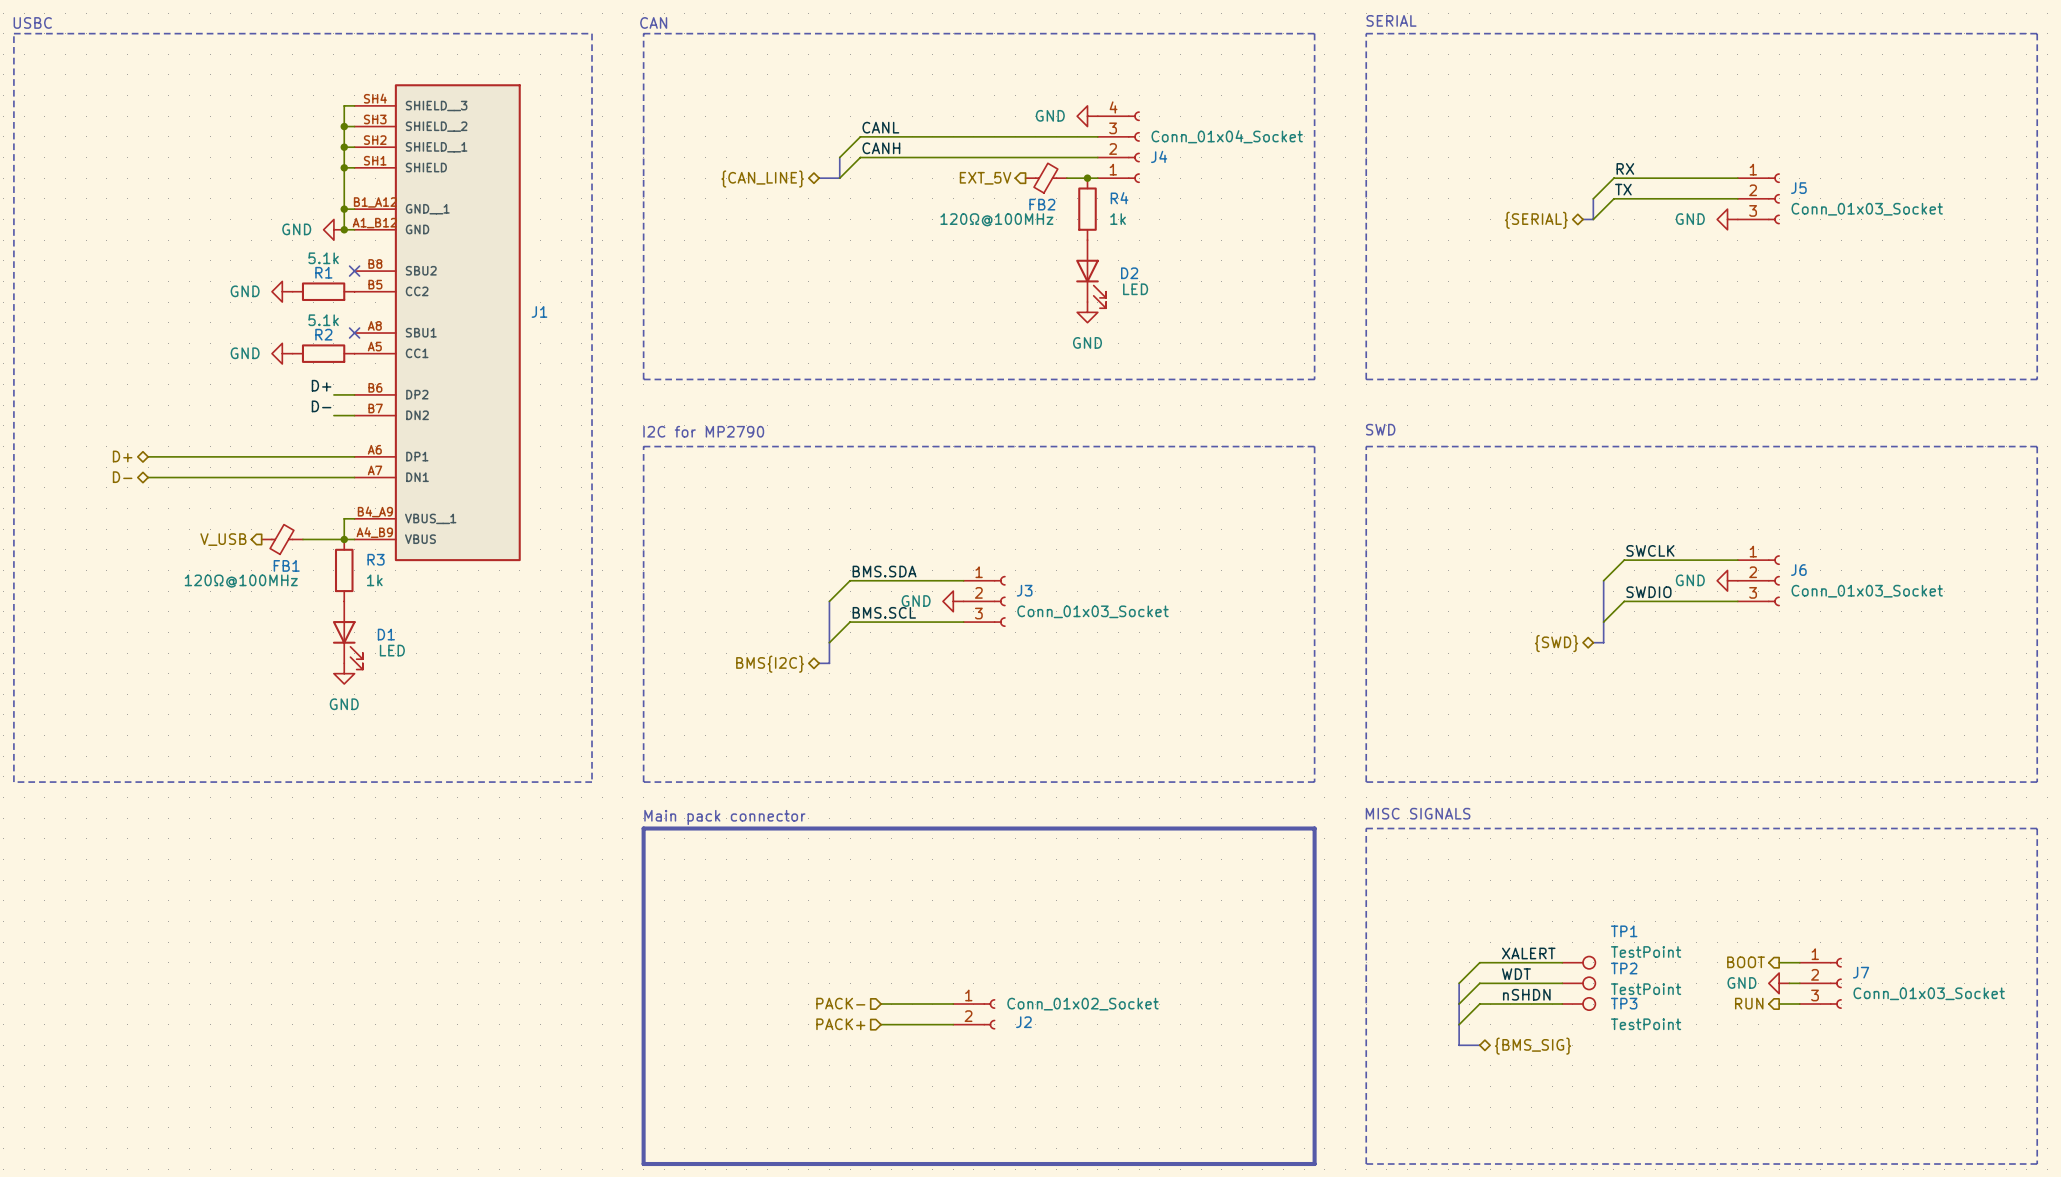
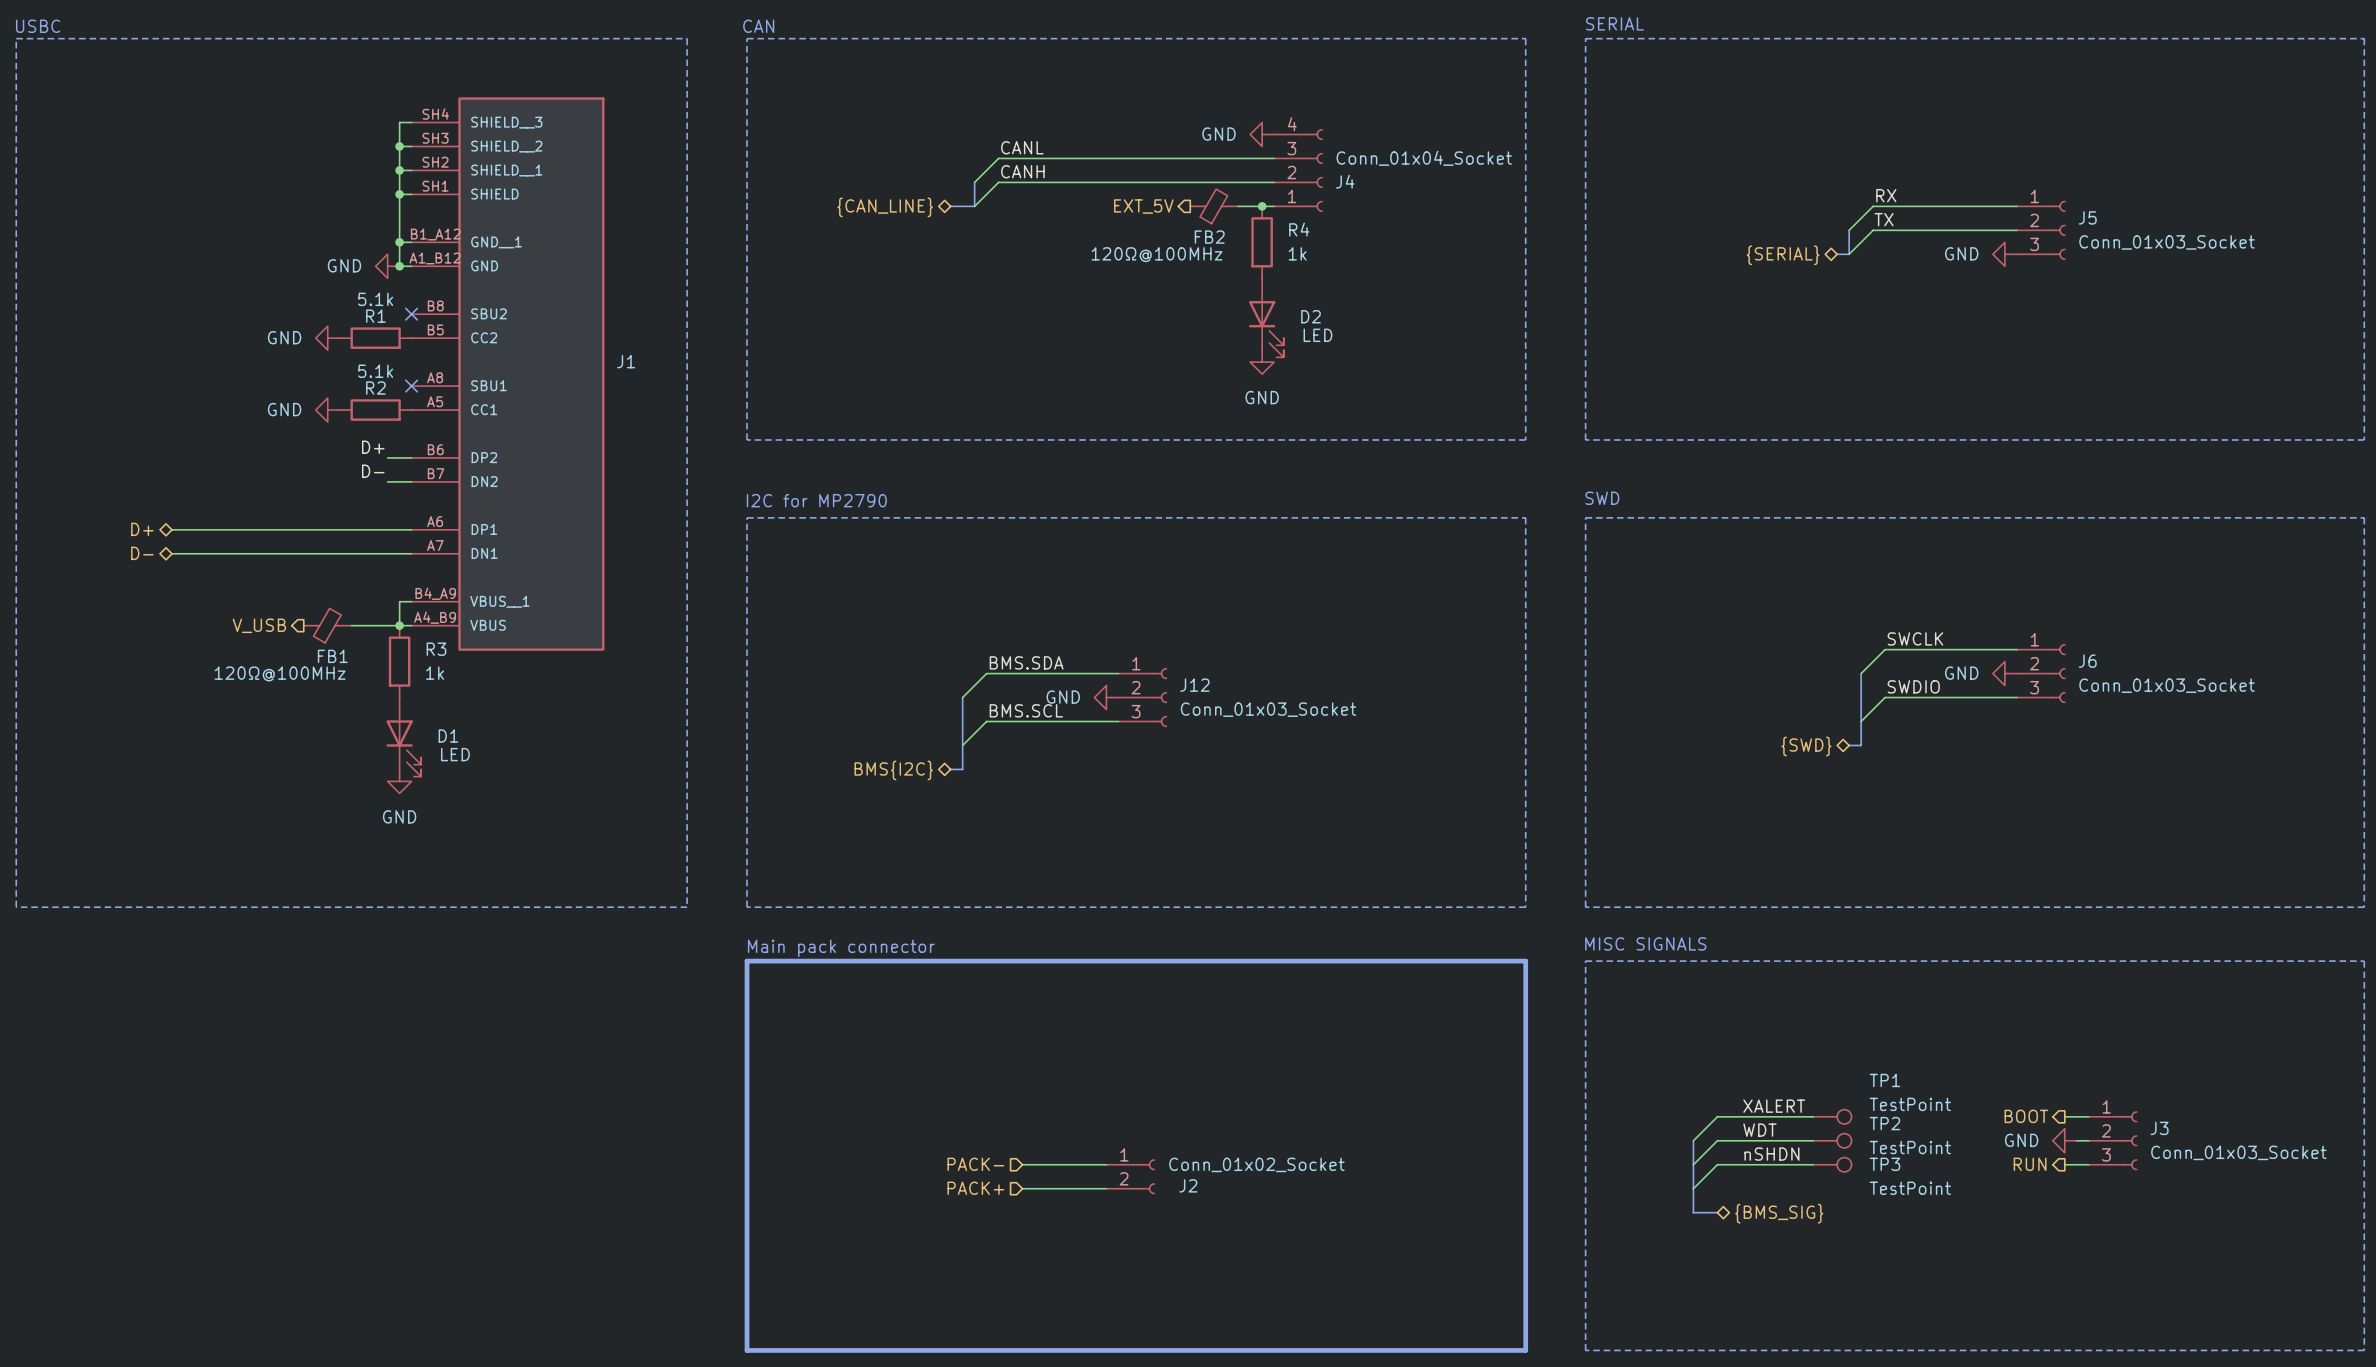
J3 name: J3 (1024, 590) -> J12 (1194, 685)
J7 name: J7 (1861, 972) -> J3 (2159, 1128)

